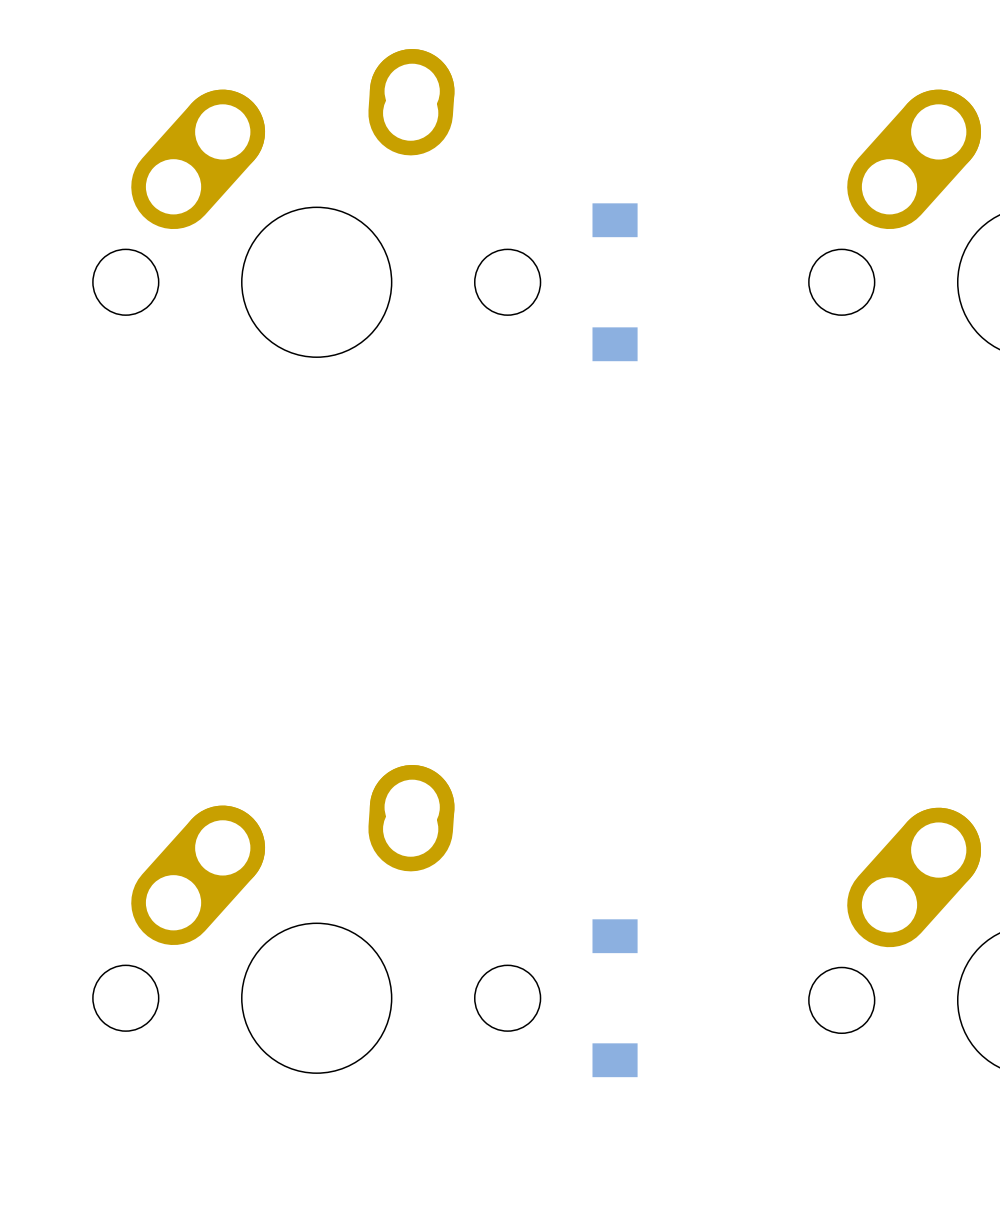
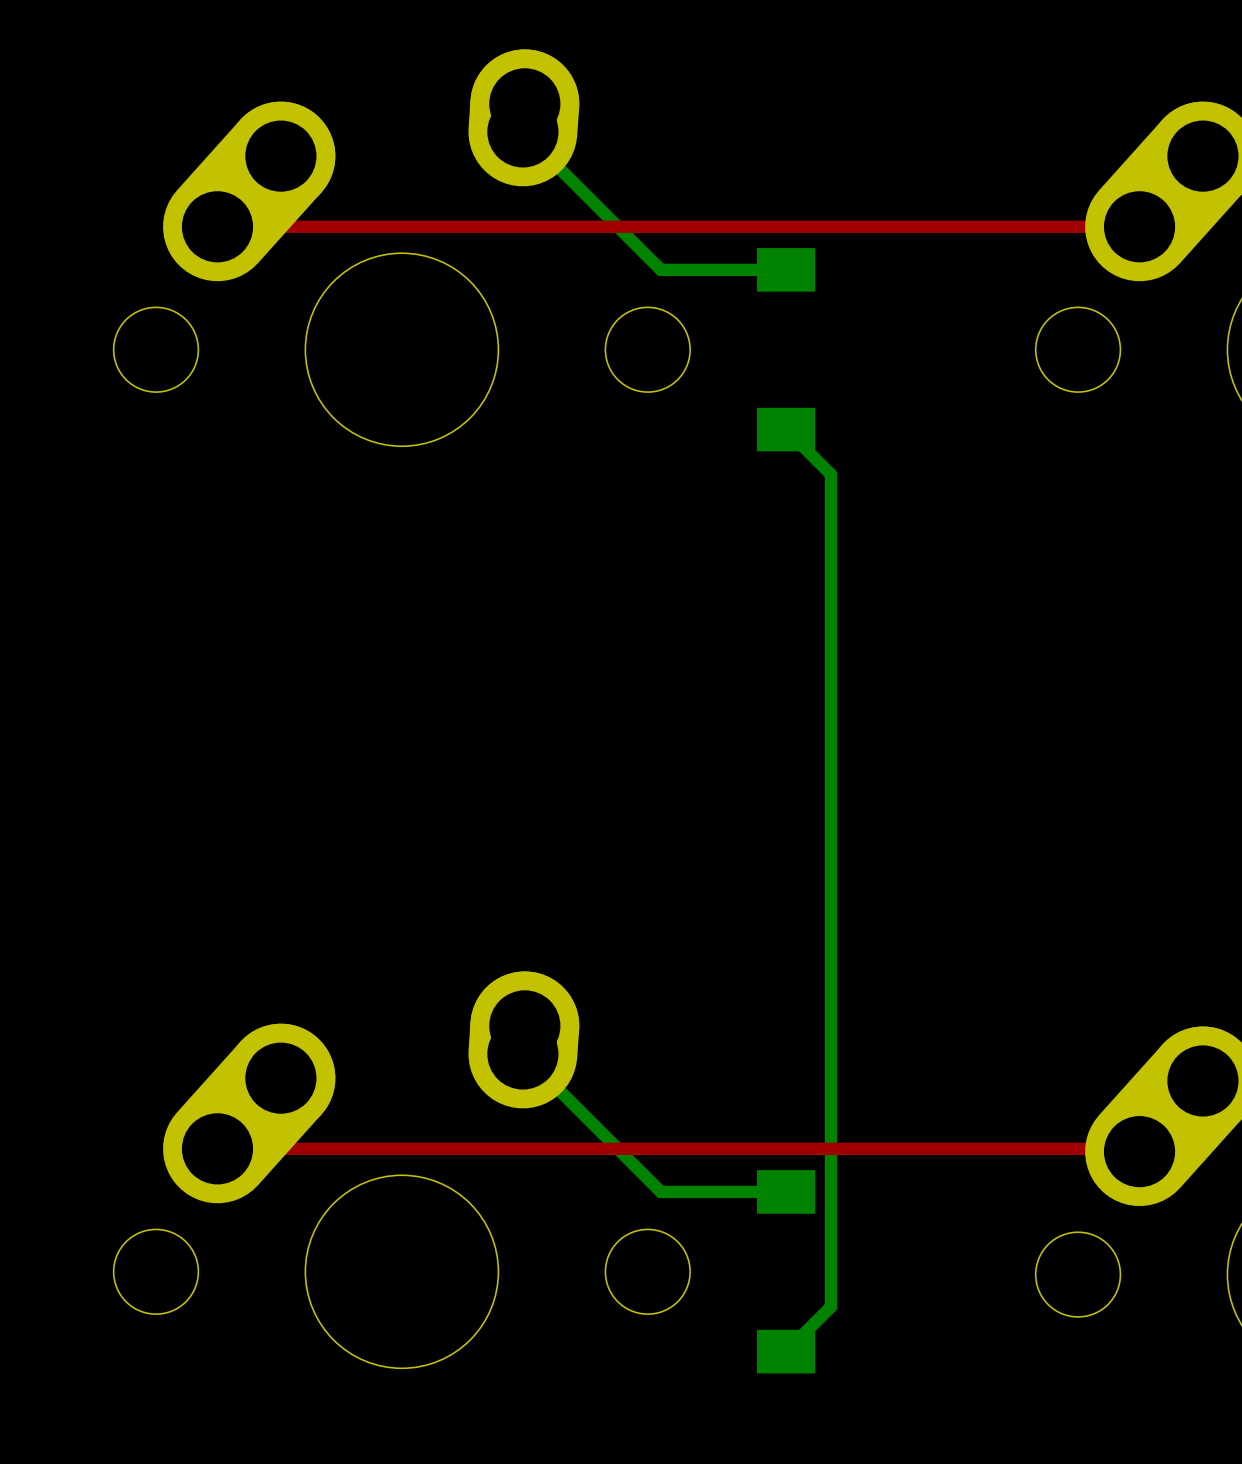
bottom track: none -> (522, 131) (660, 269) (786, 269)
top track: none -> (217, 226) (1139, 226)
bottom track: none -> (786, 429) (830, 474) (830, 1306) (786, 1351)
bottom track: none -> (522, 1053) (660, 1191) (786, 1191)
top track: none -> (217, 1148) (1136, 1148) (1139, 1151)

